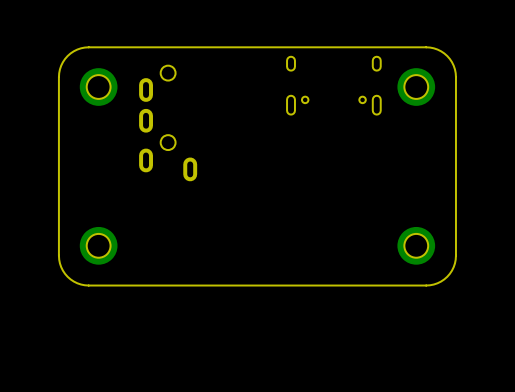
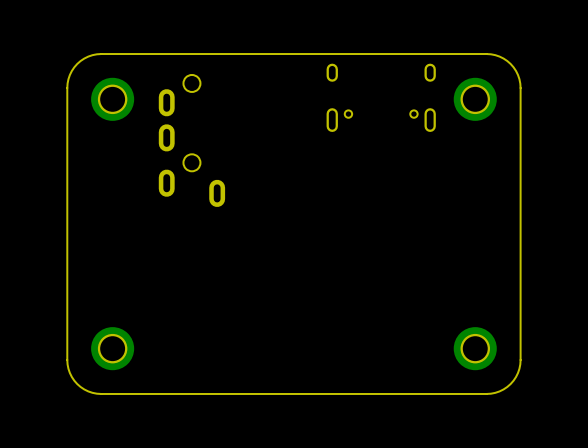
part position: (98, 245) -> (112, 348)
part position: (416, 245) -> (475, 348)
board edge: (455, 255) (453, 267) (447, 276) (437, 283) (426, 285) (84, 285) (73, 281) (65, 273) (61, 267) (58, 255) -> (520, 291) (519, 368) (516, 376) (507, 386) (495, 392) (486, 393) (92, 392) (77, 384) (68, 368) (67, 291)

